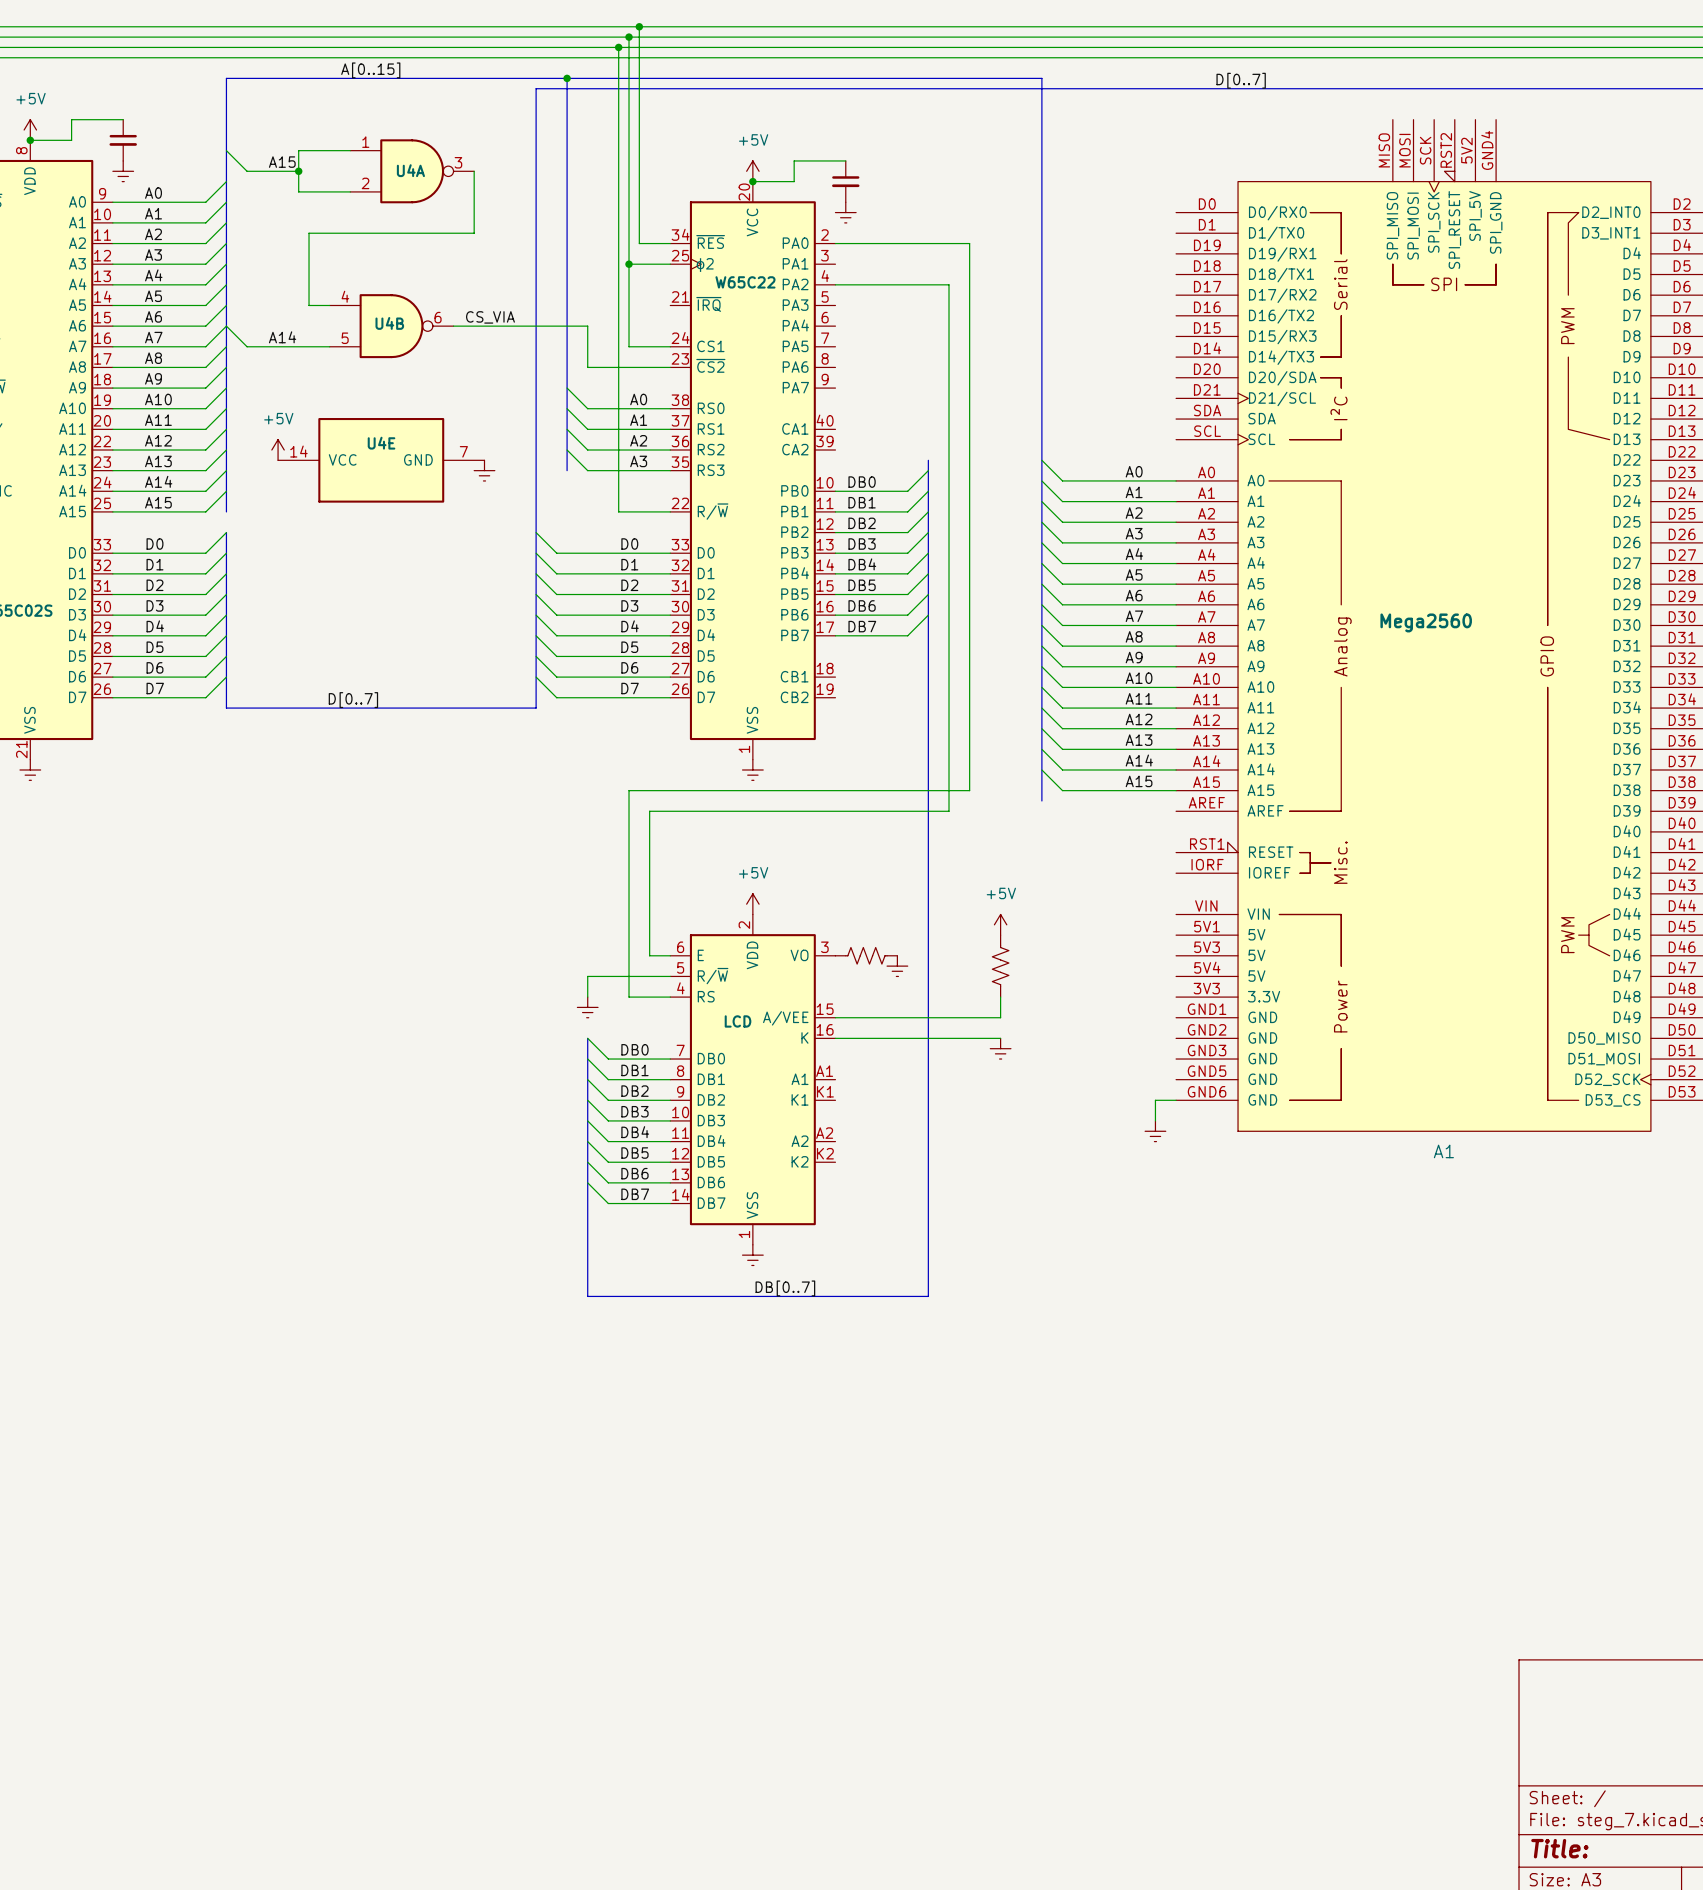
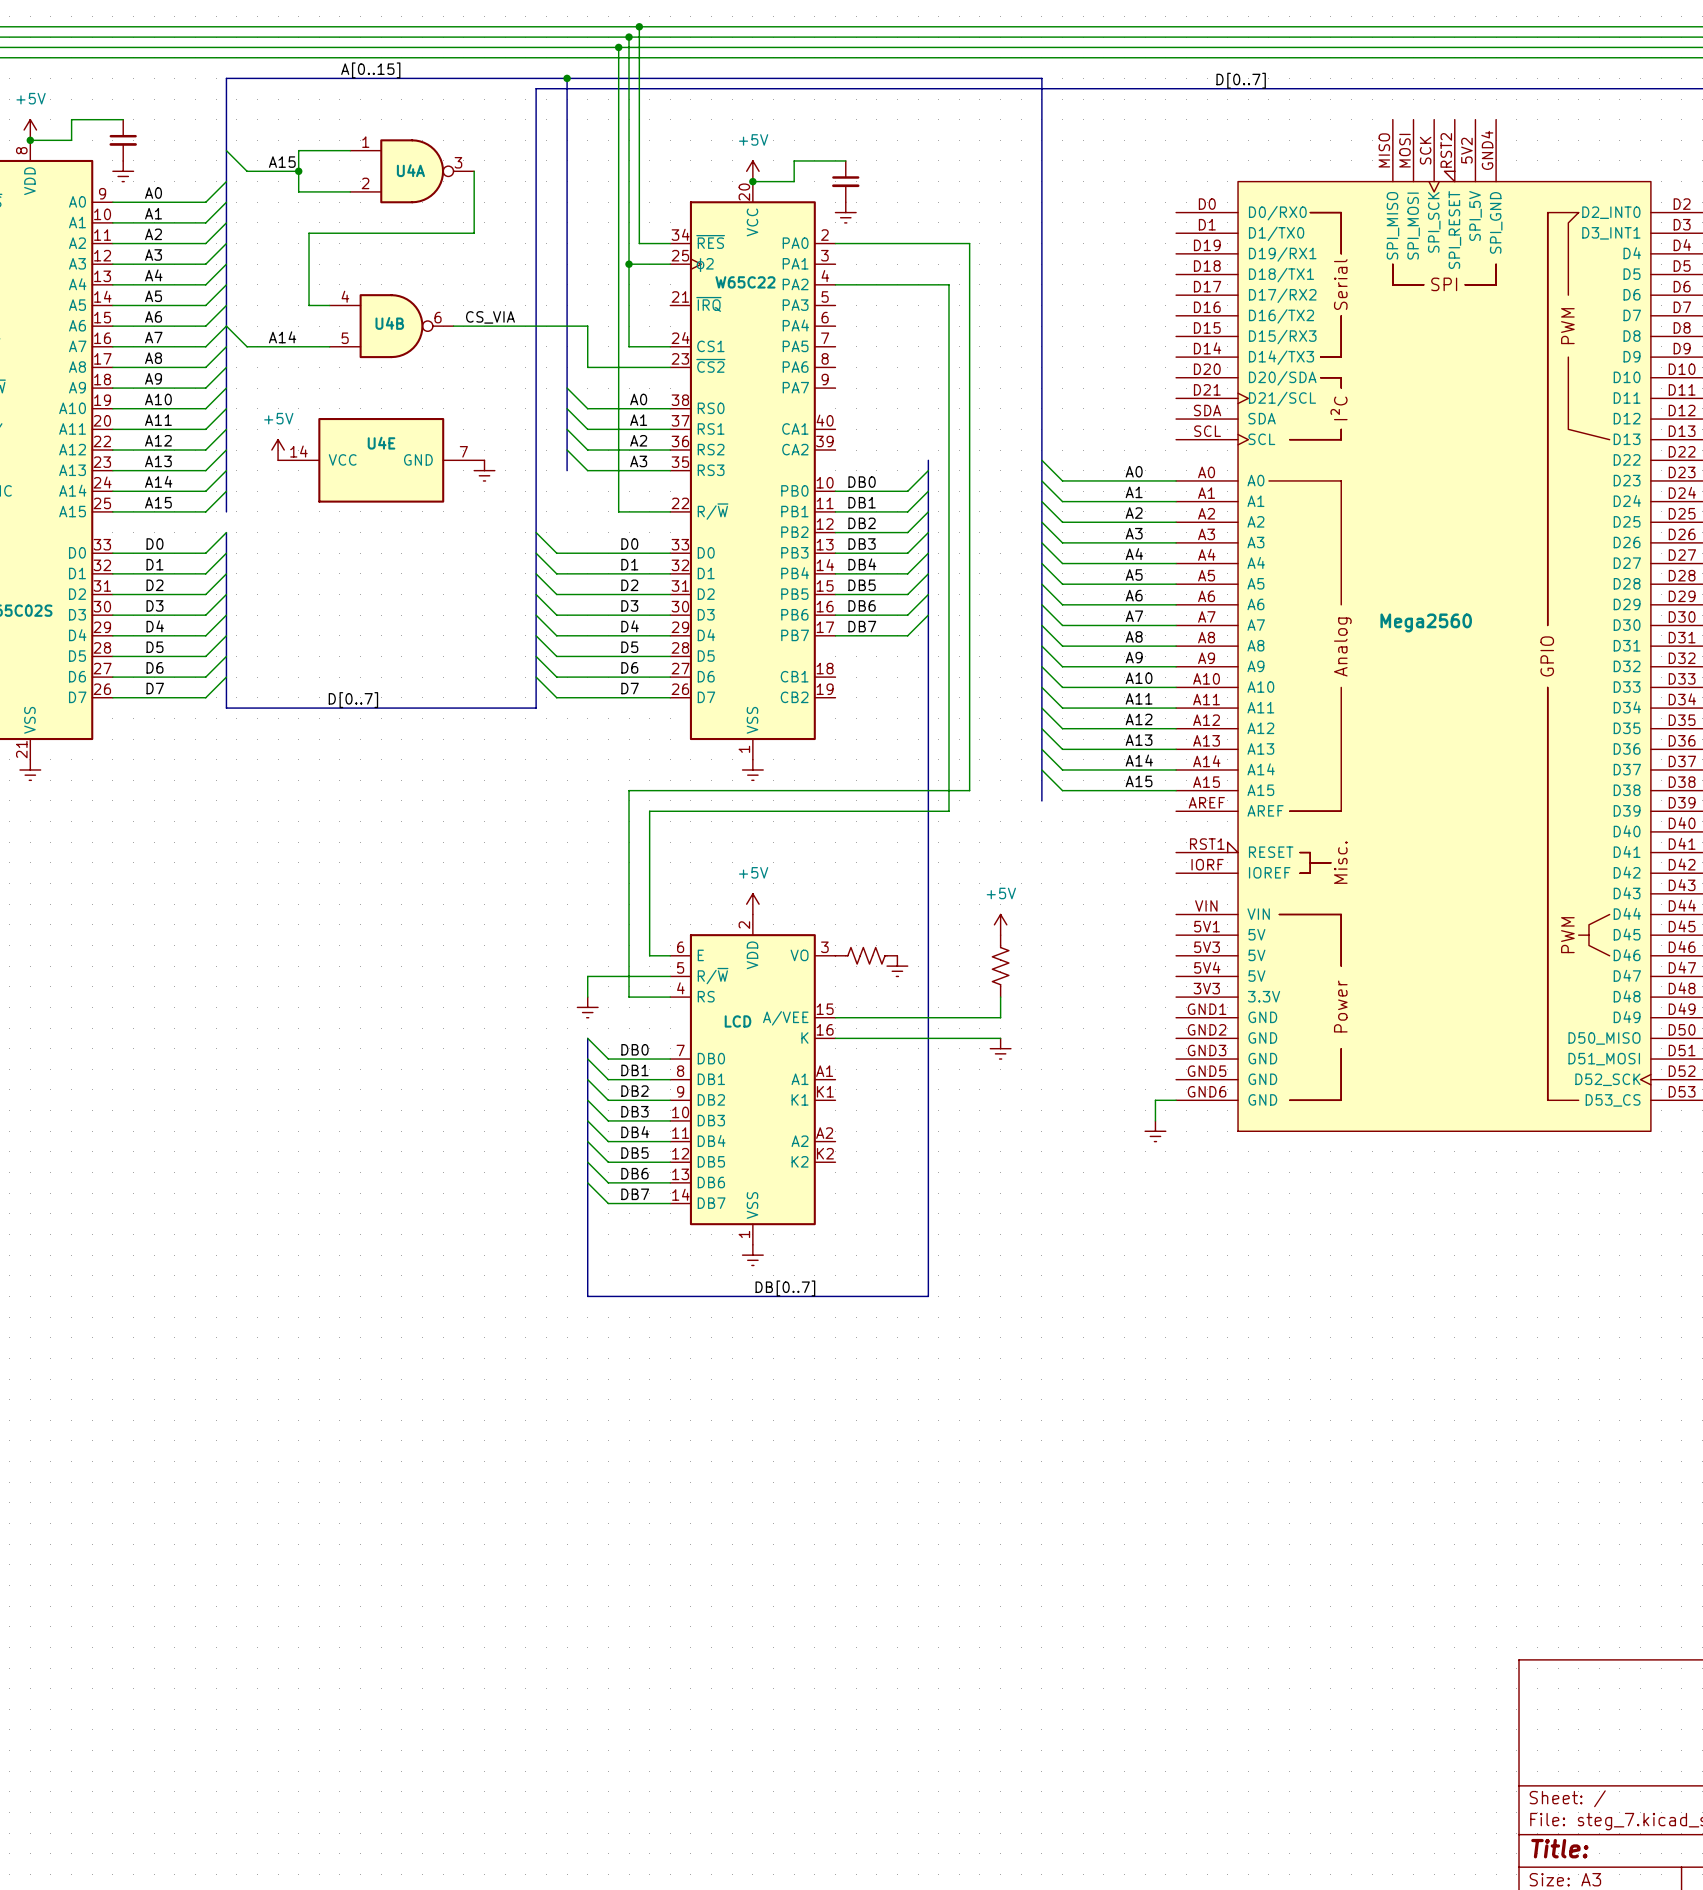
A1 name: A1 (1443, 1151) -> none

